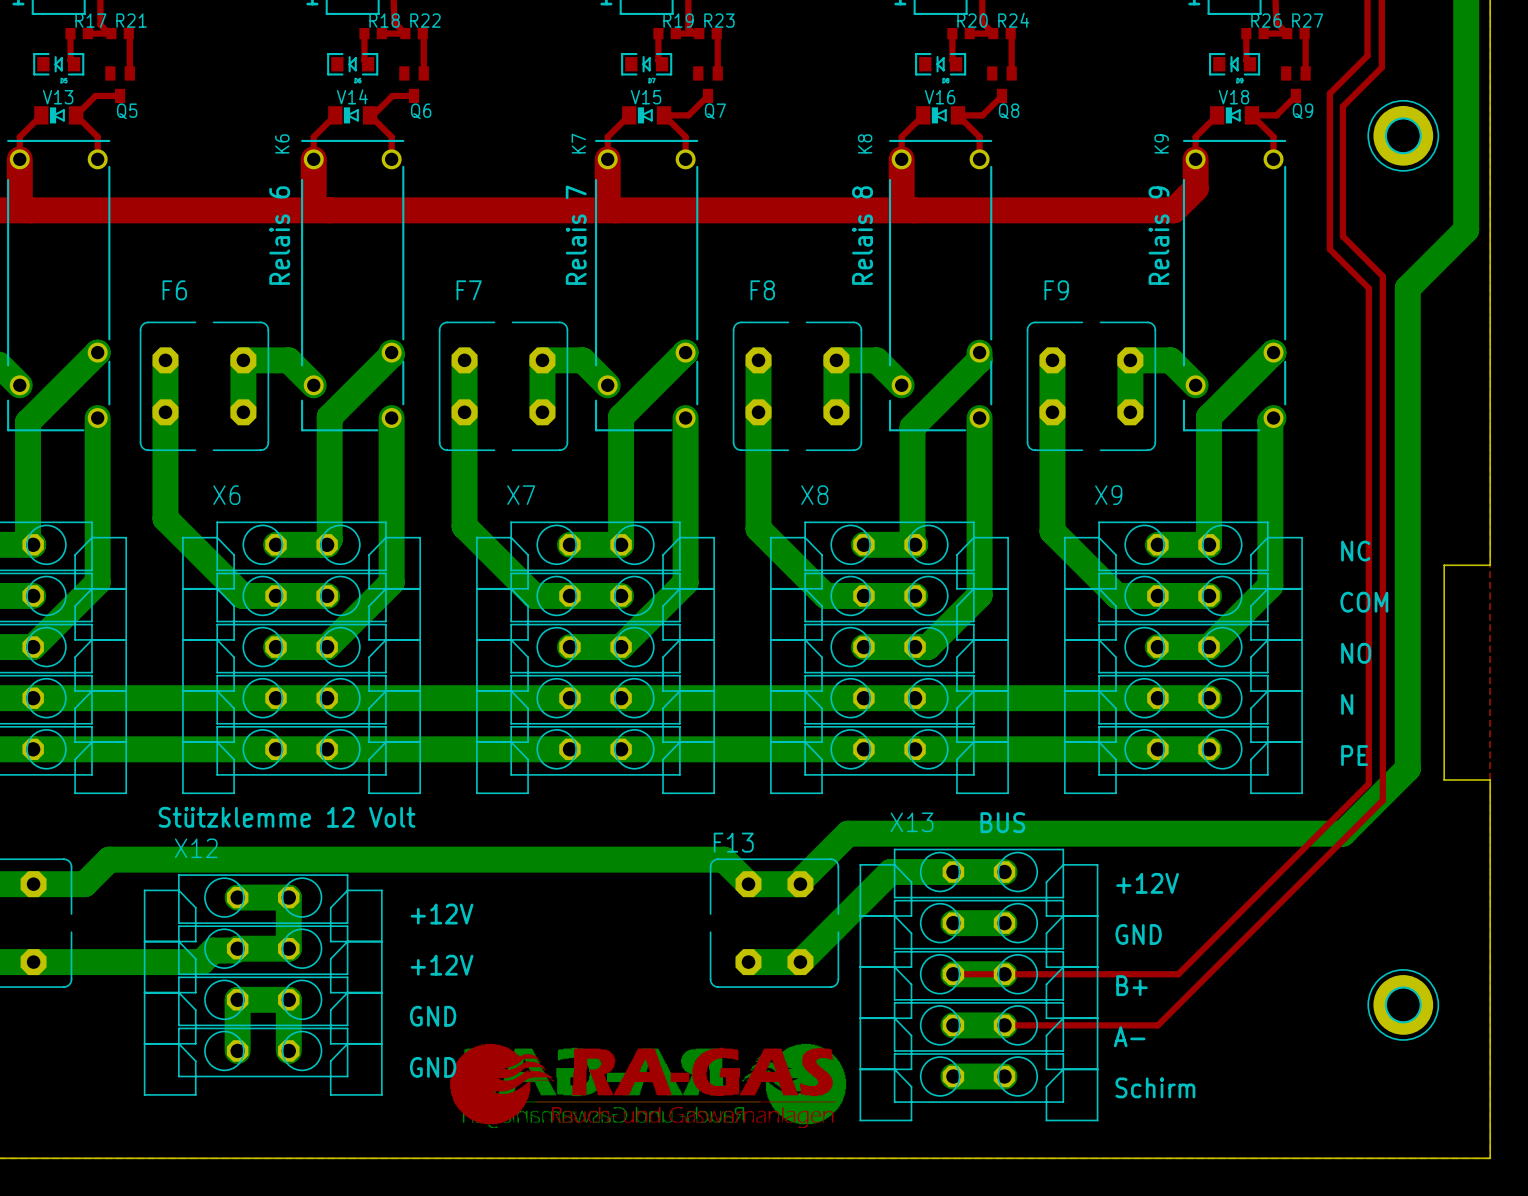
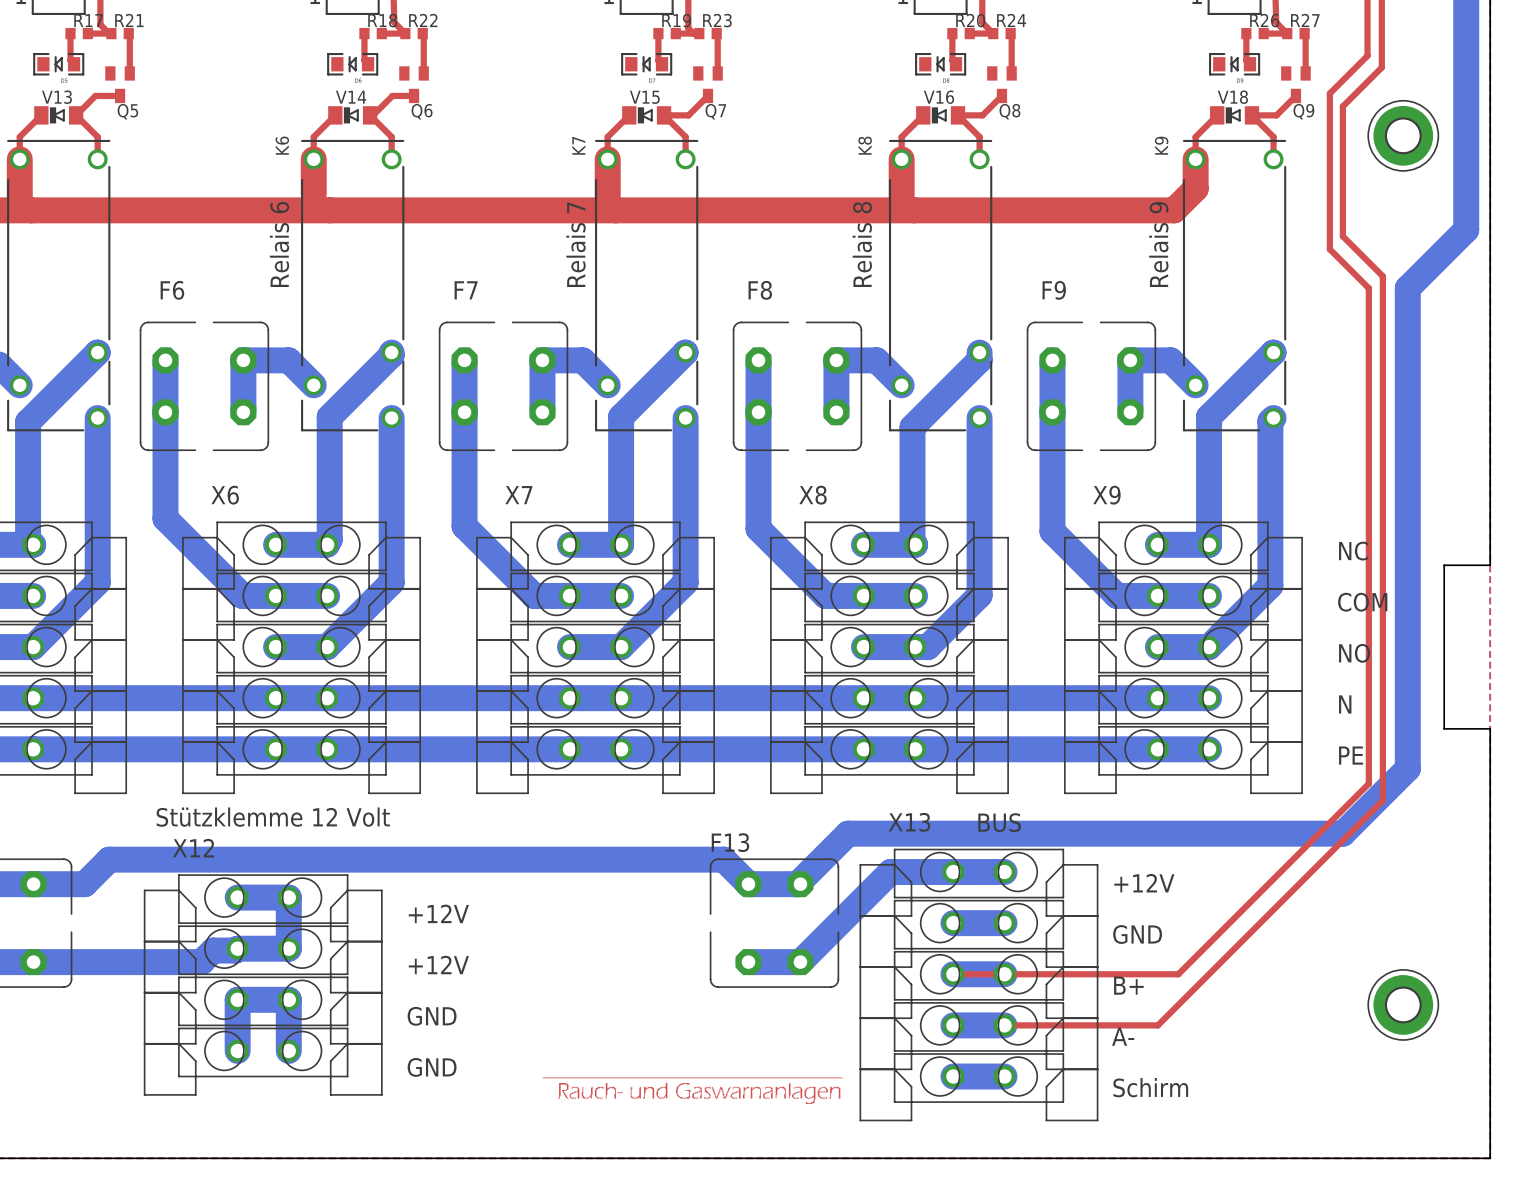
board edge: (1444, 728) (1444, 779) (1490, 779) -> (1444, 728) (1490, 728) (1490, 779)
drawing: [450, 1043, 847, 1129] -> none
drawing: none -> [542, 1077, 843, 1105]

